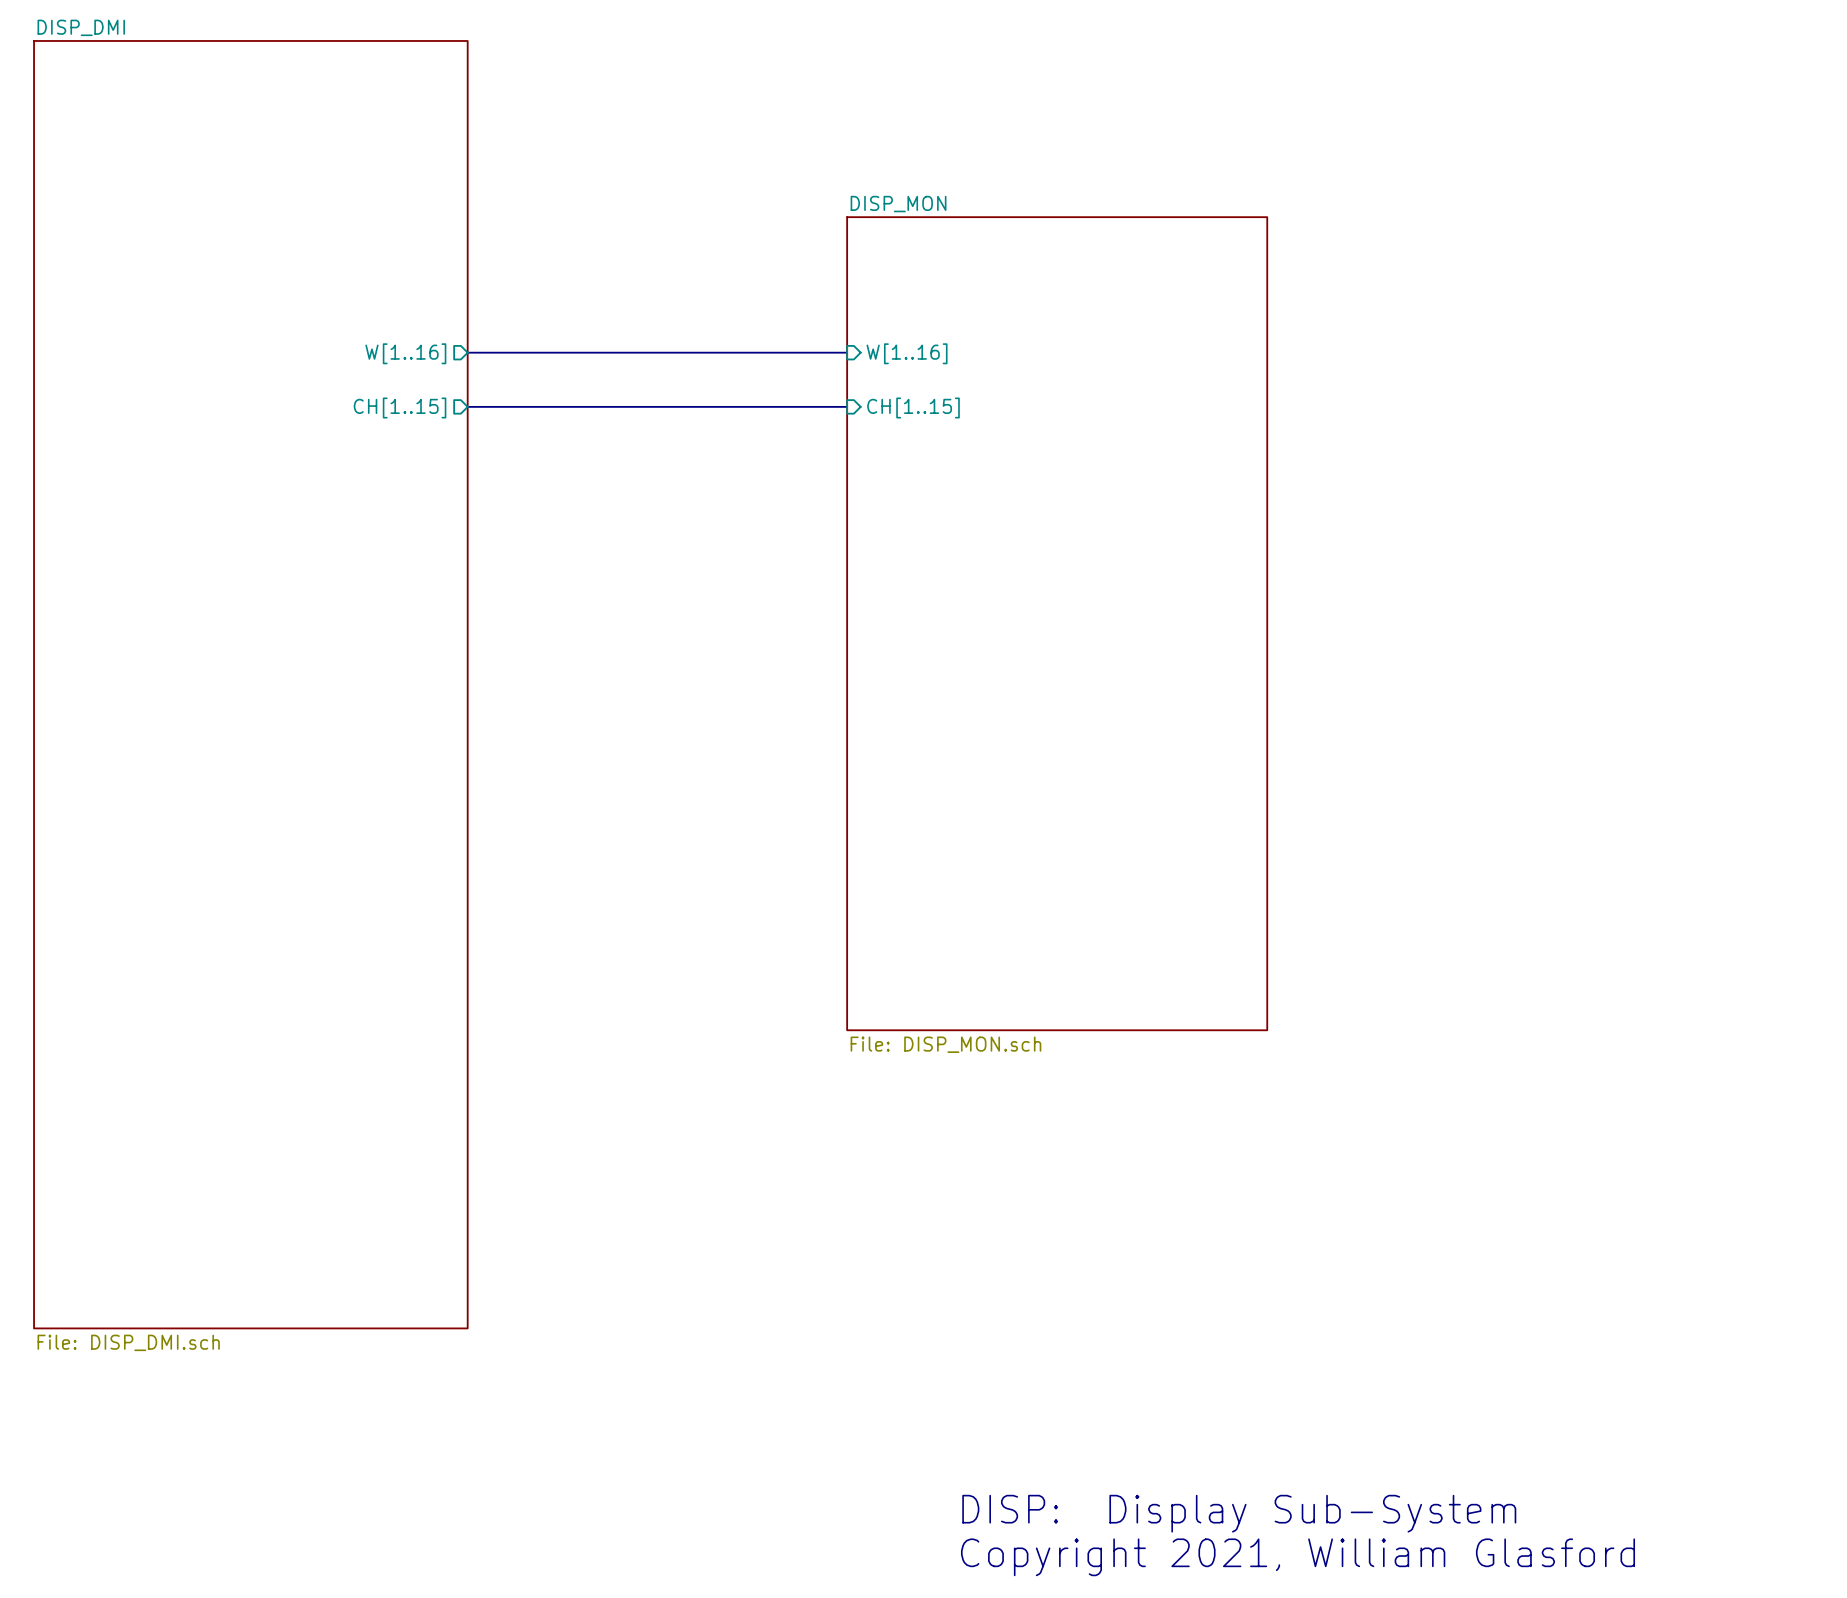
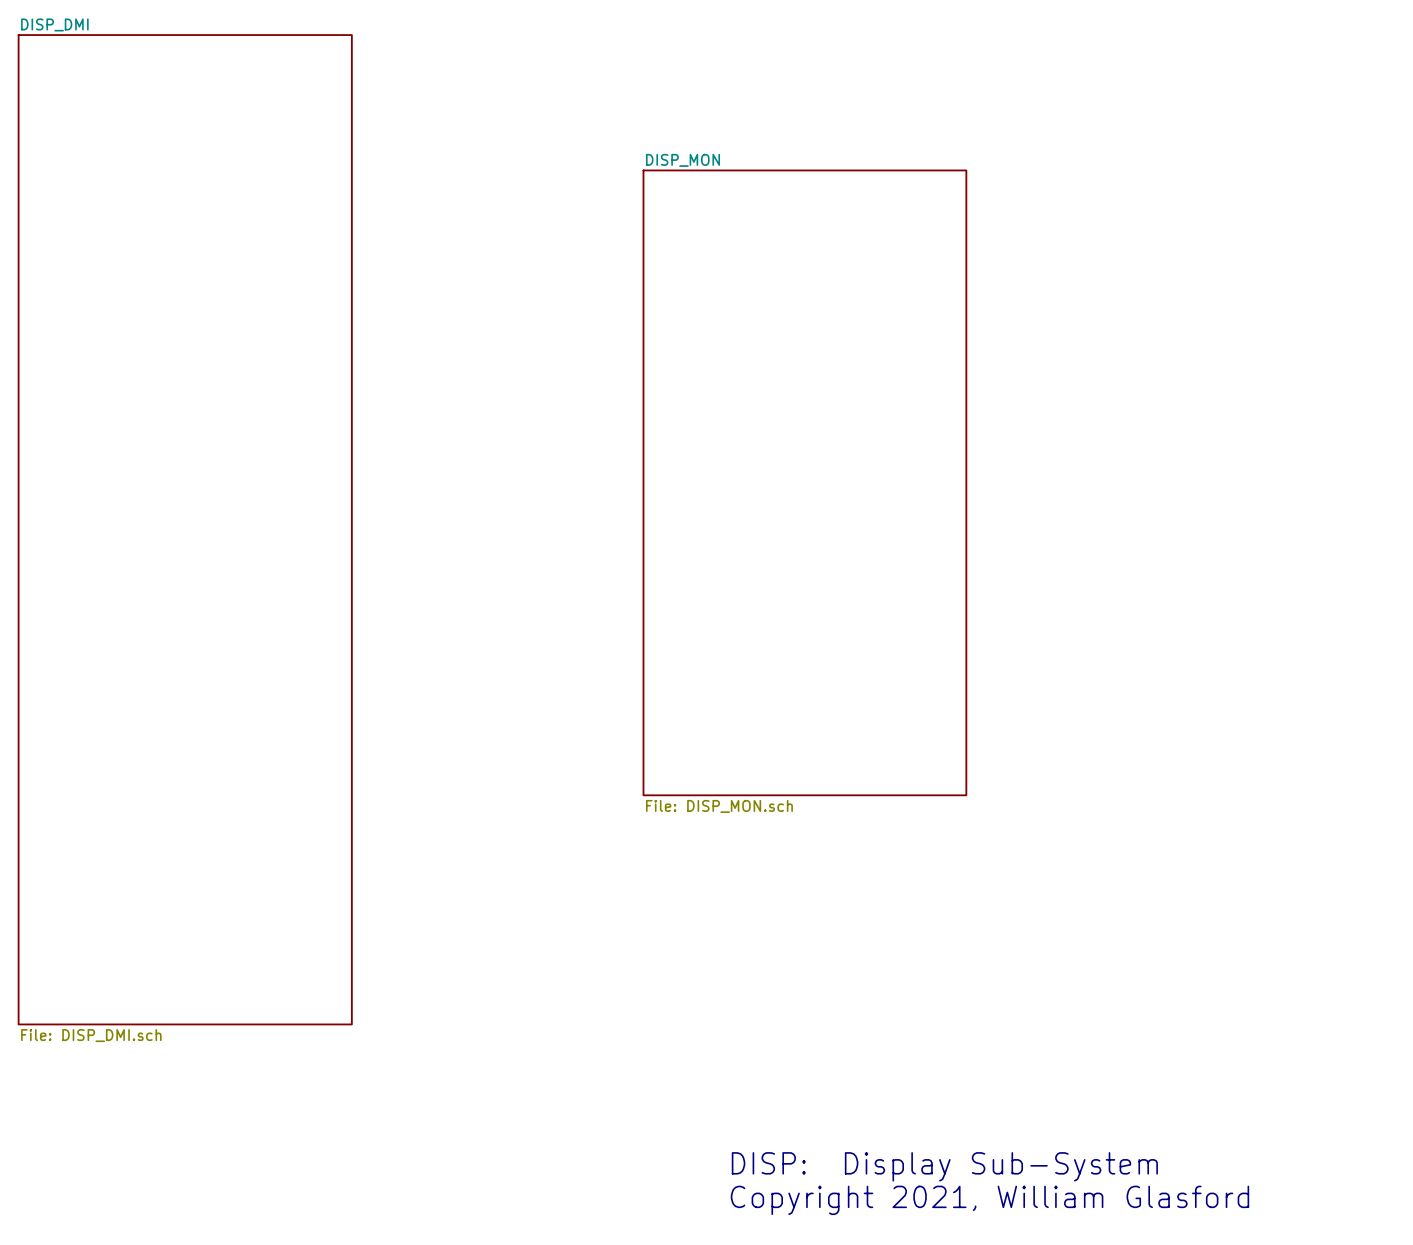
bus: (467, 352) (847, 352) -> none
sheet pin: W[1..16] (405, 353) -> none
sheet pin: W[1..16] (907, 353) -> none
bus: (467, 406) (847, 406) -> none
sheet pin: CH[1..15] (400, 407) -> none
sheet pin: CH[1..15] (913, 407) -> none

